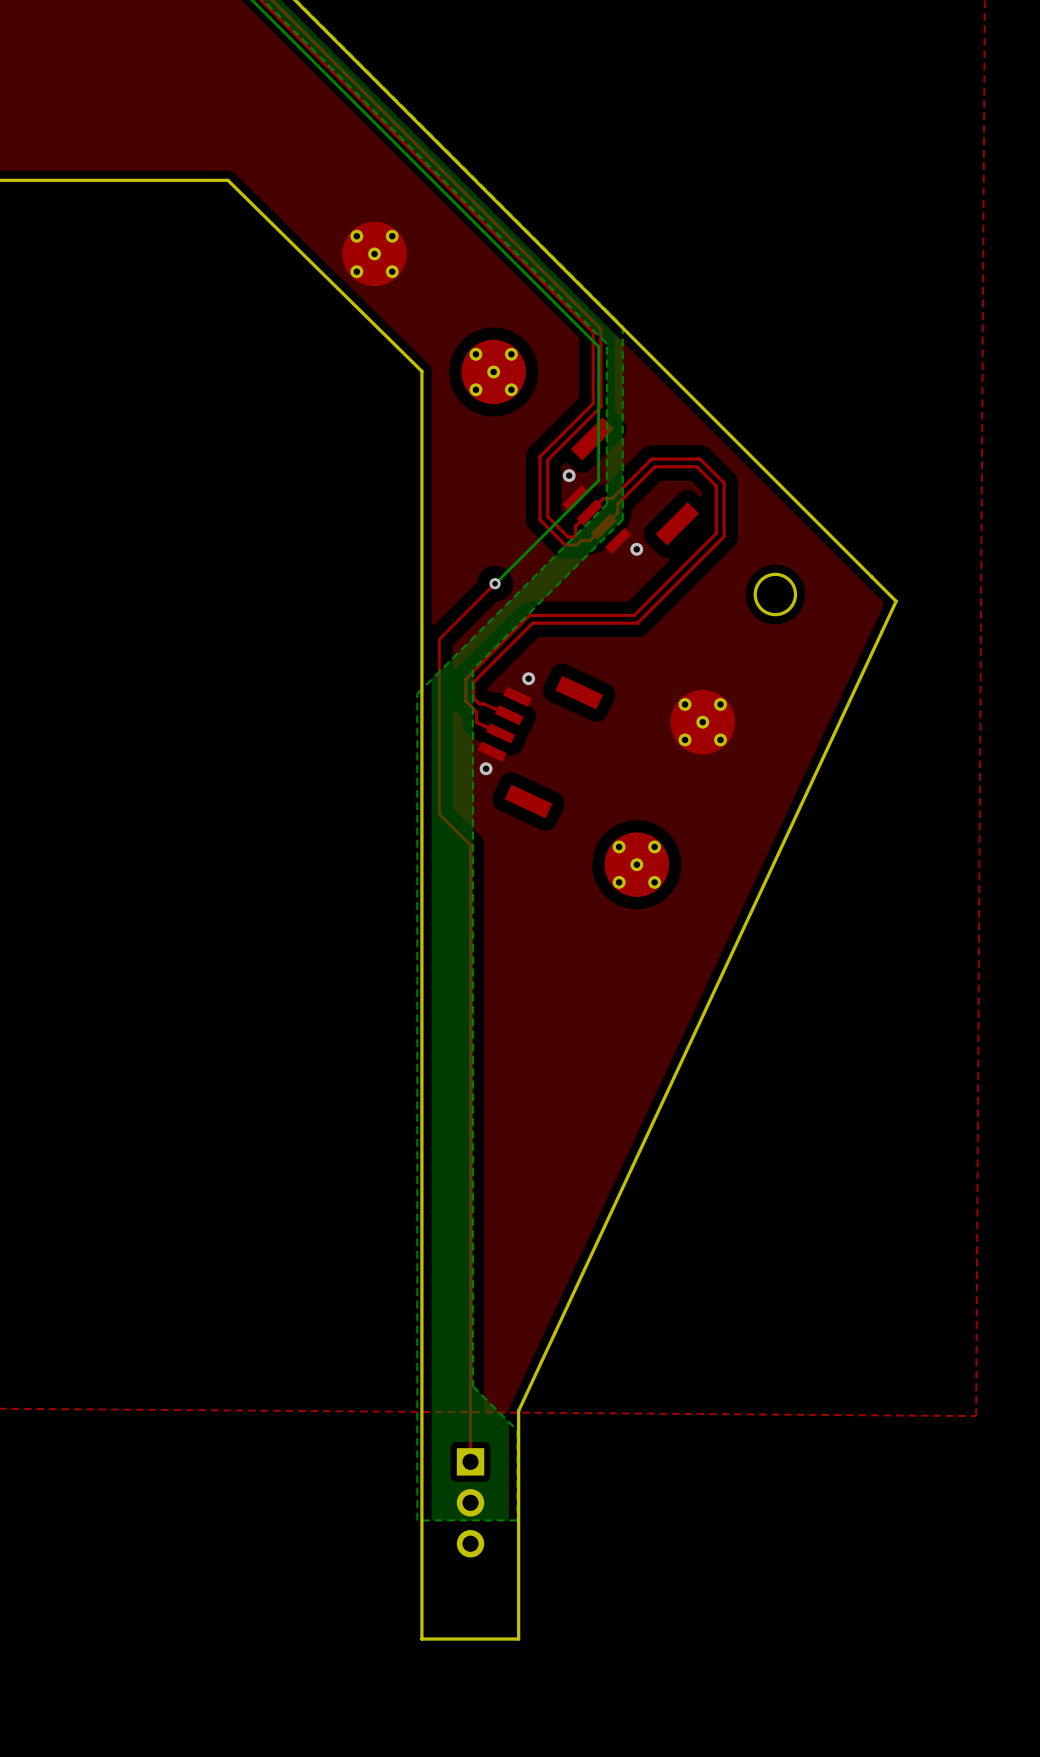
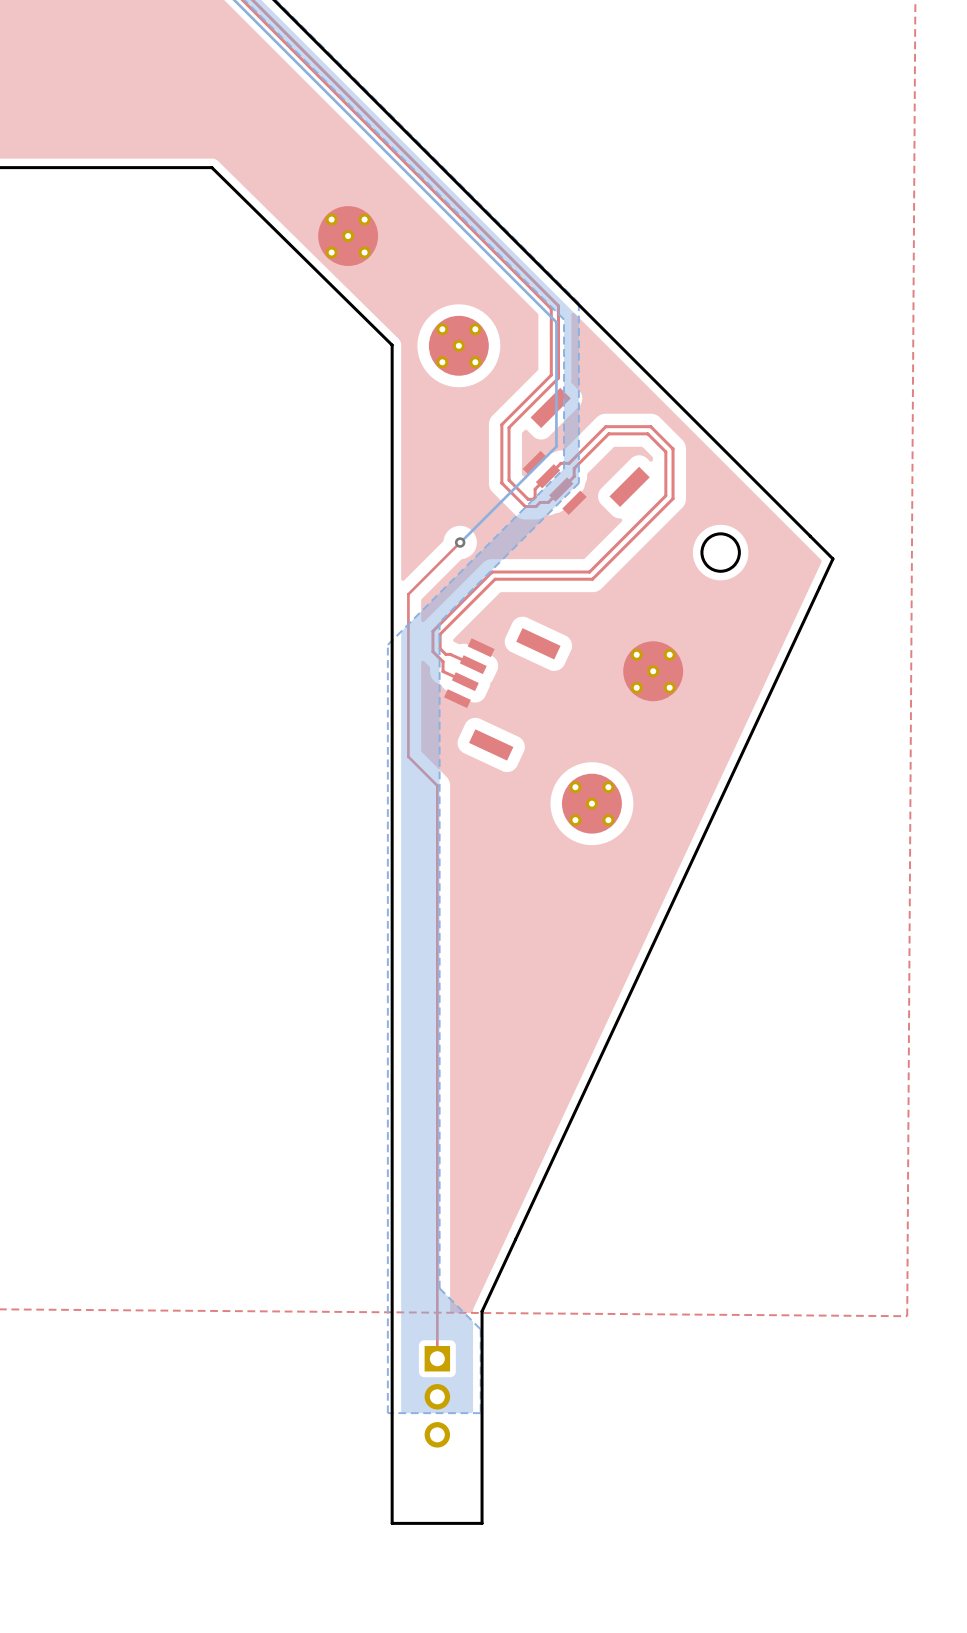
via: (569, 475) -> none
via: (636, 549) -> none
via: (528, 678) -> none
via: (486, 768) -> none

